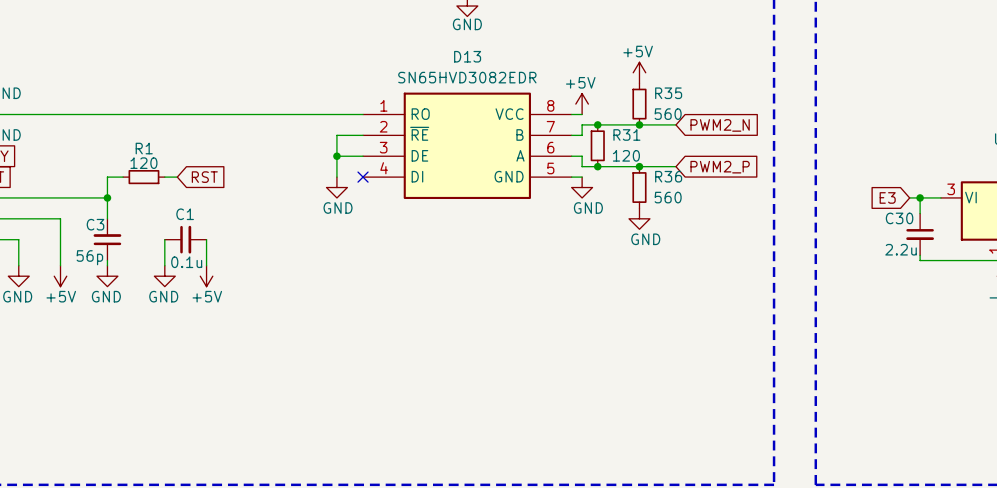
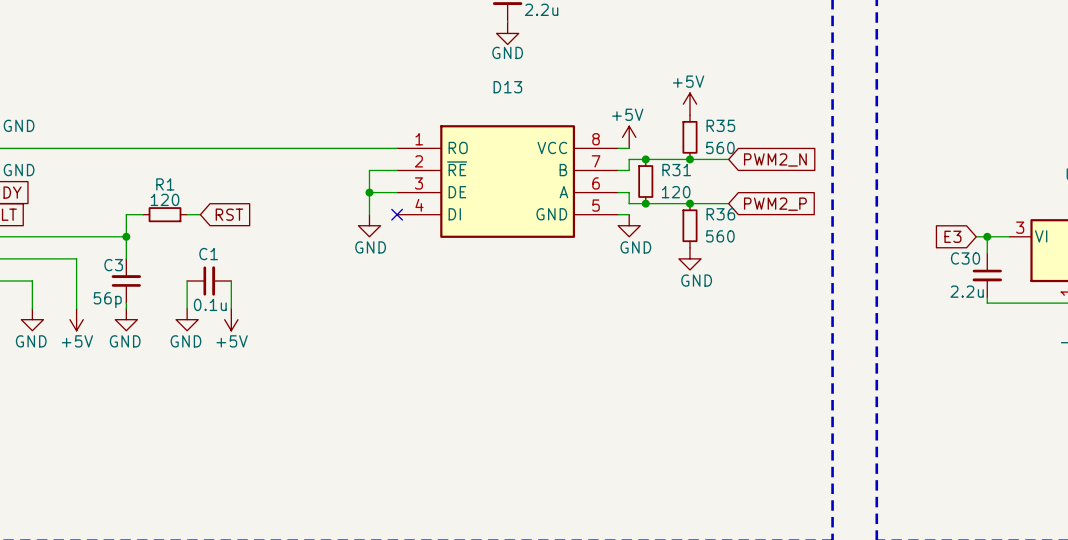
D13 value: SN65HVD3082EDR (467, 77) -> none

